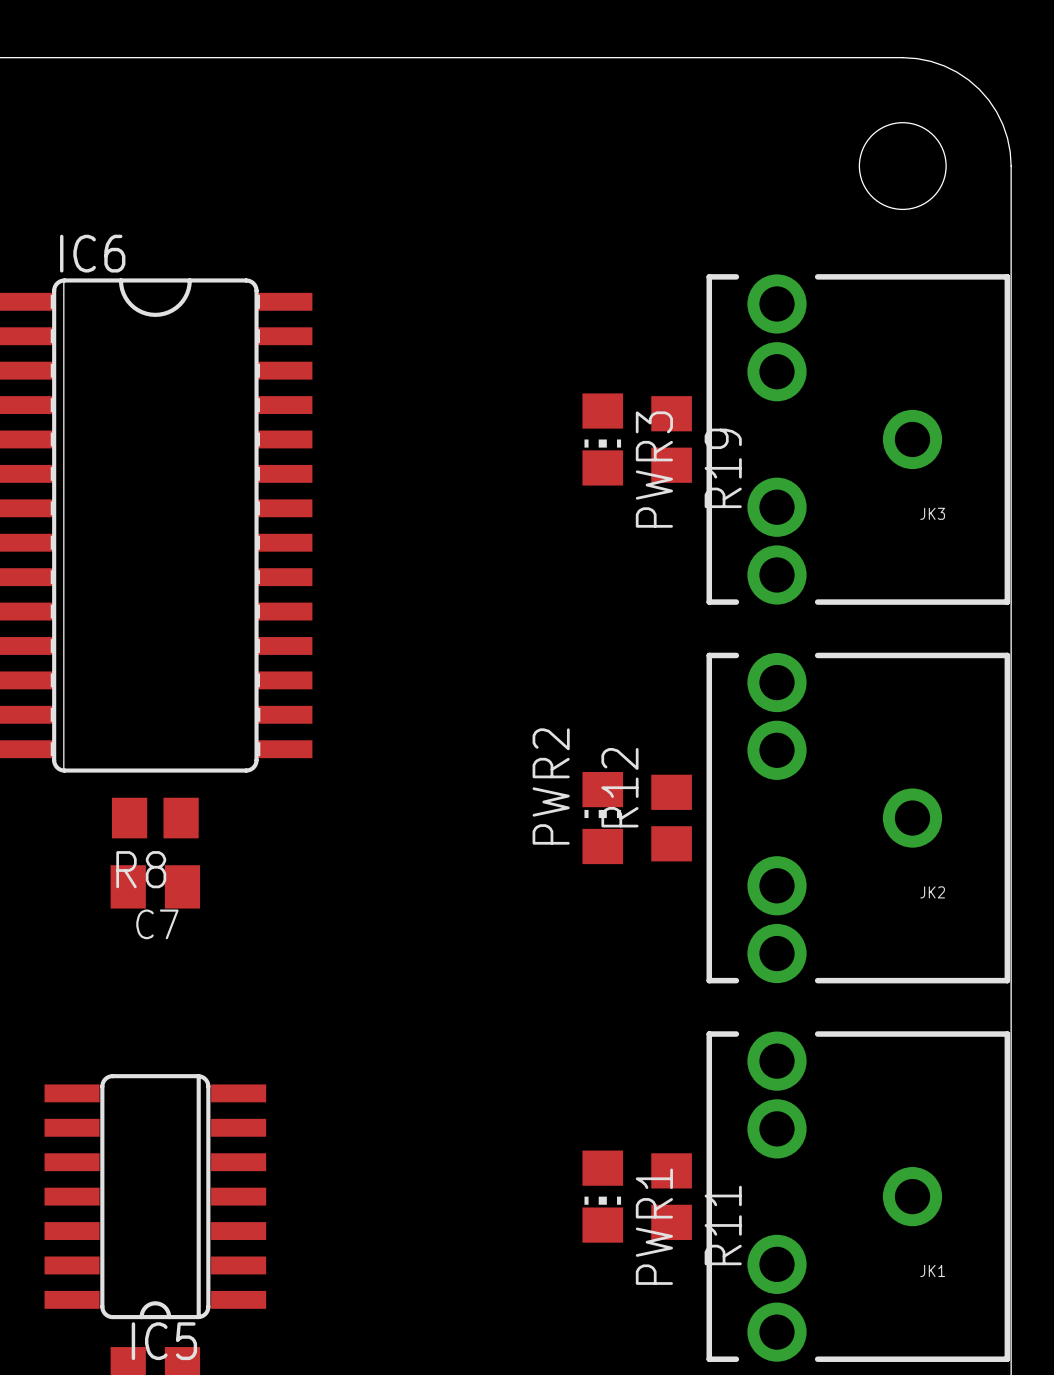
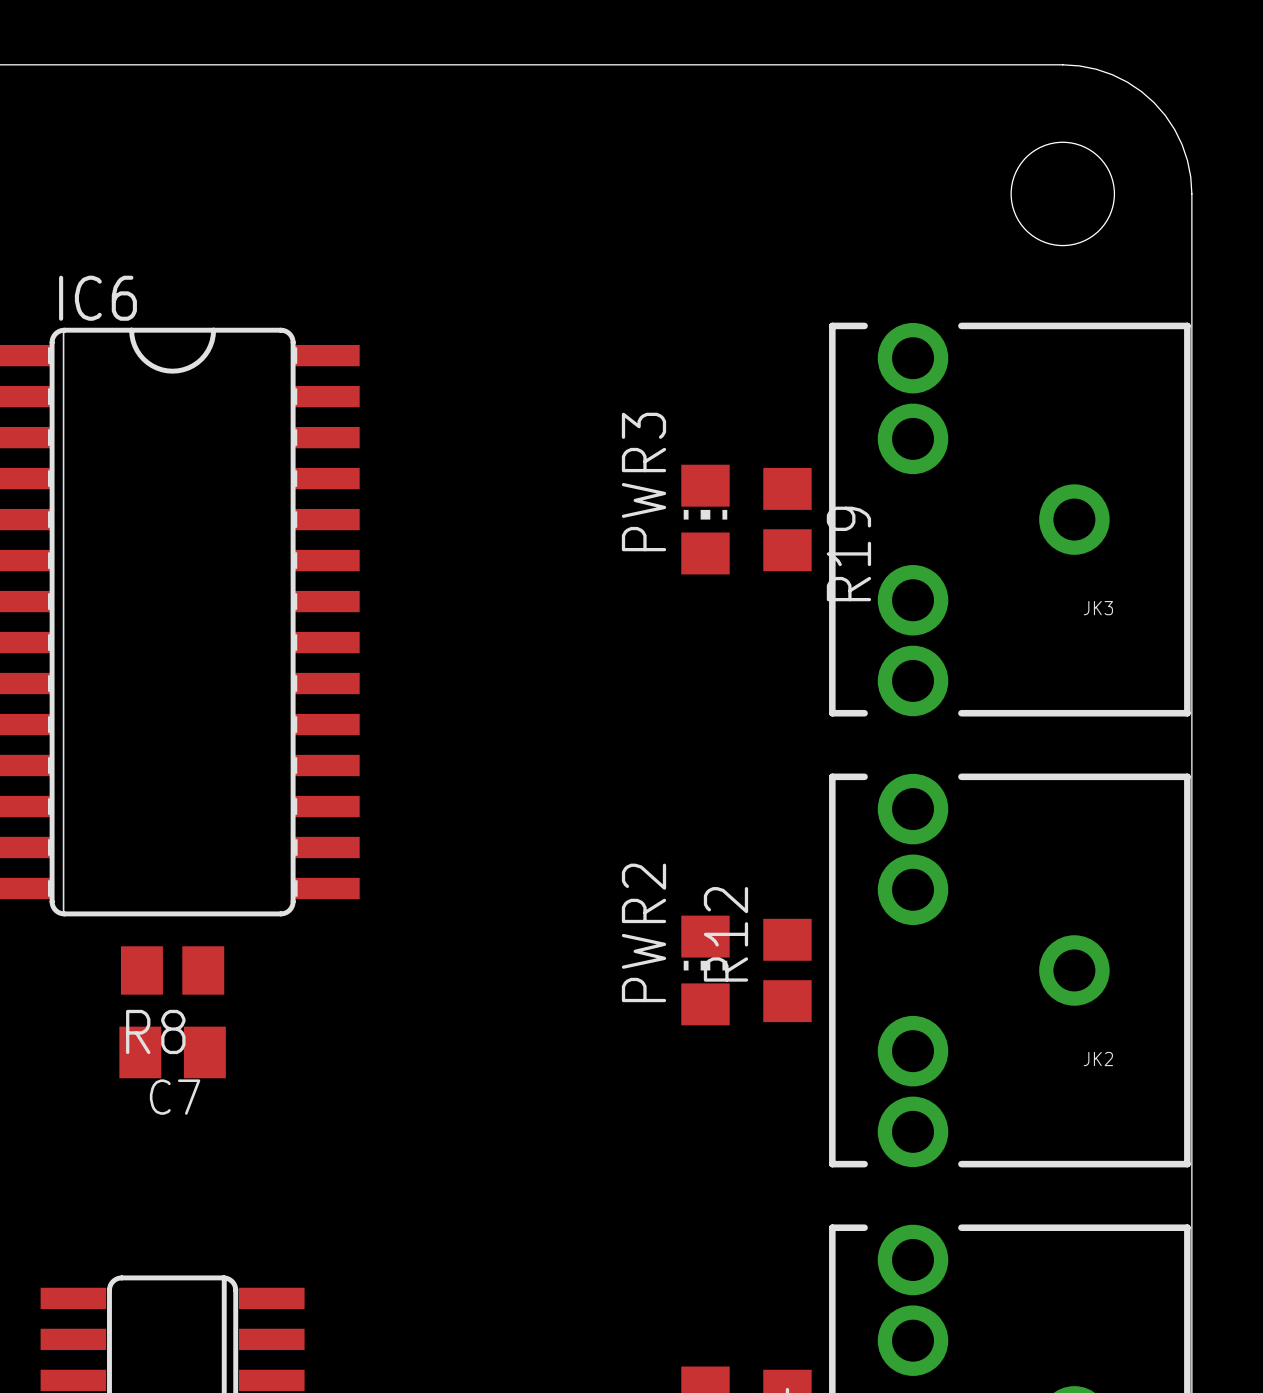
PWR3 rotation: 0° (602, 439) -> 180° (705, 519)

